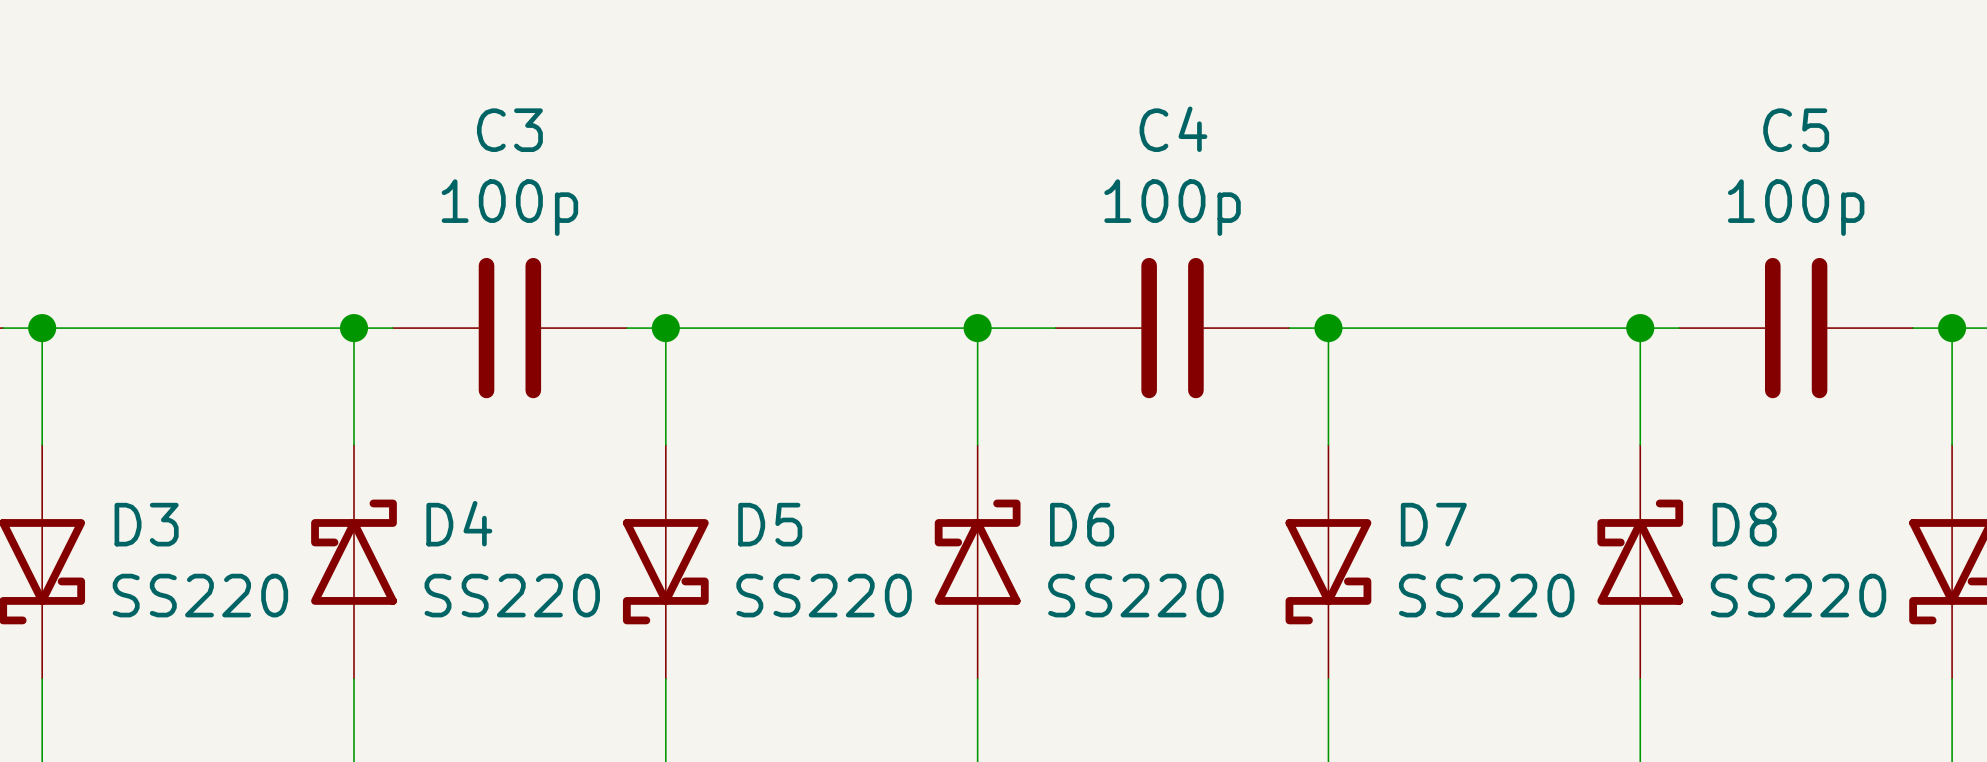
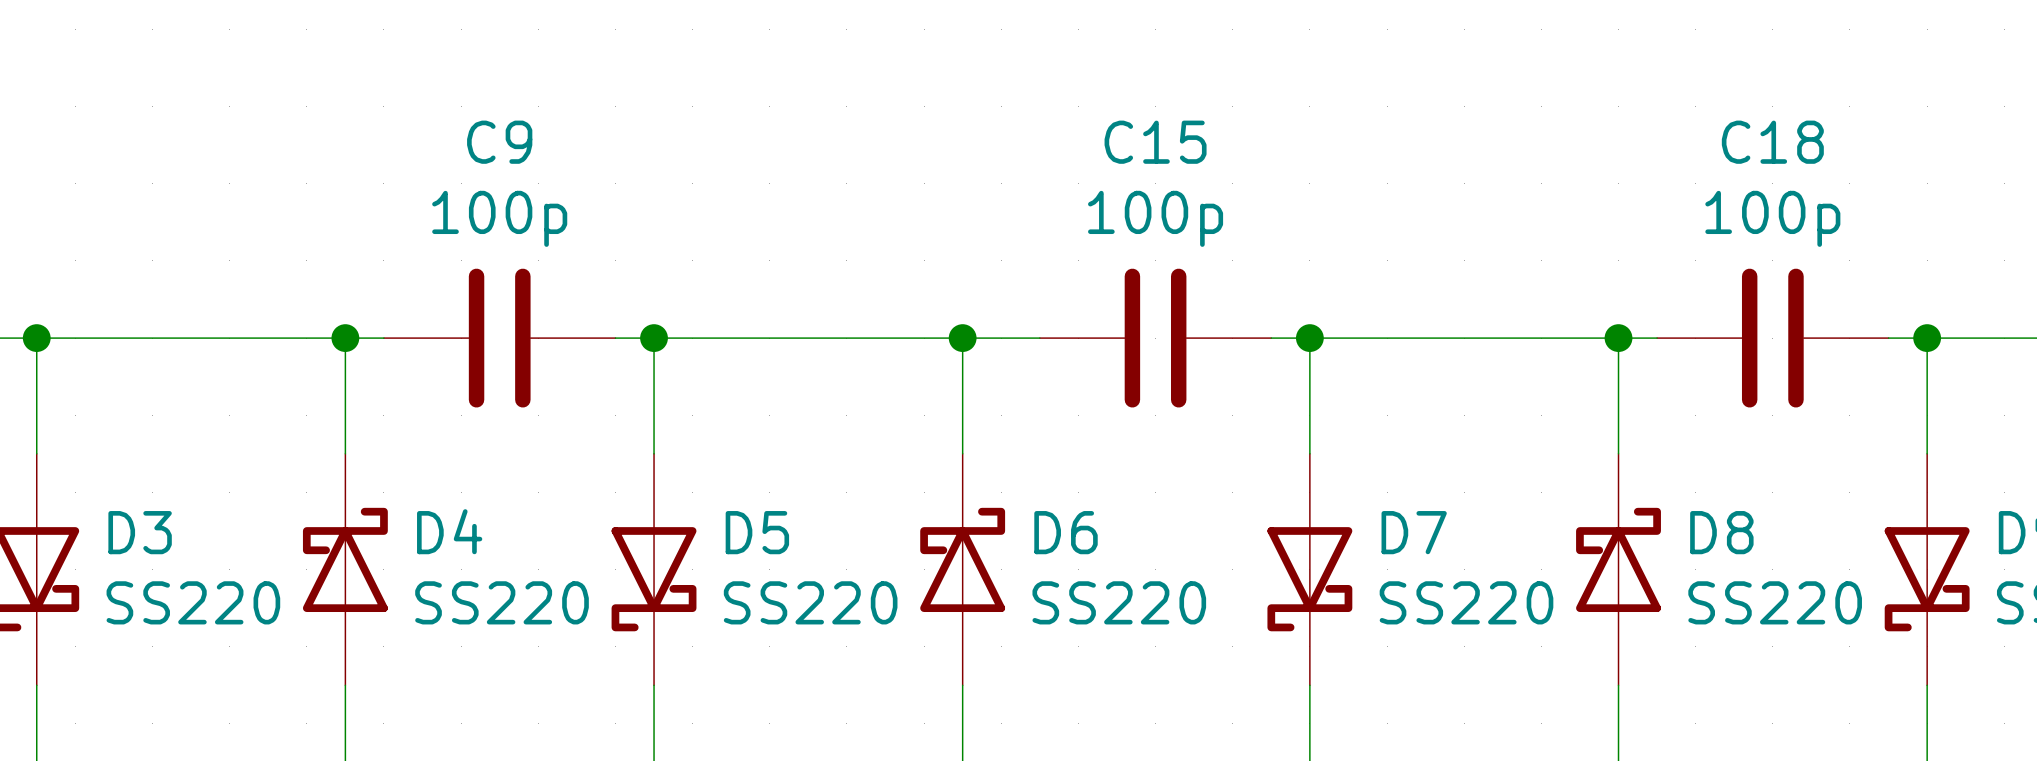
C4 name: C4 (1173, 129) -> C15 (1155, 142)
C3 name: C3 (509, 130) -> C9 (499, 142)
C5 name: C5 (1796, 130) -> C18 (1772, 142)

